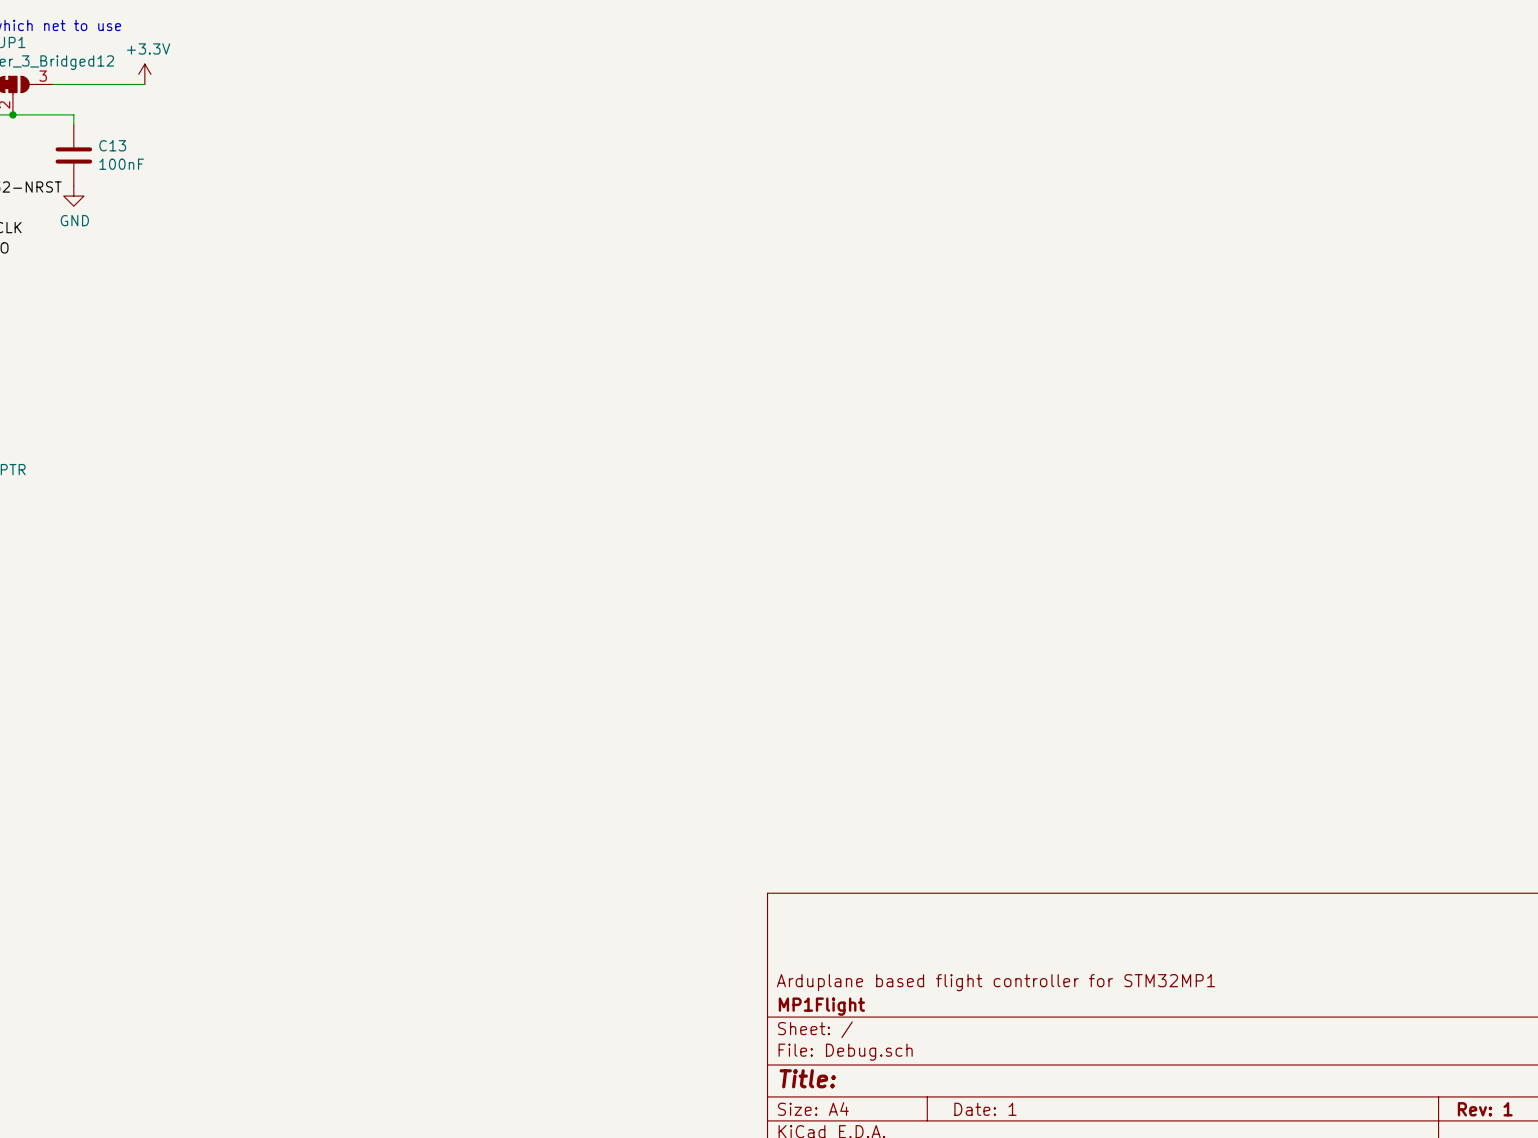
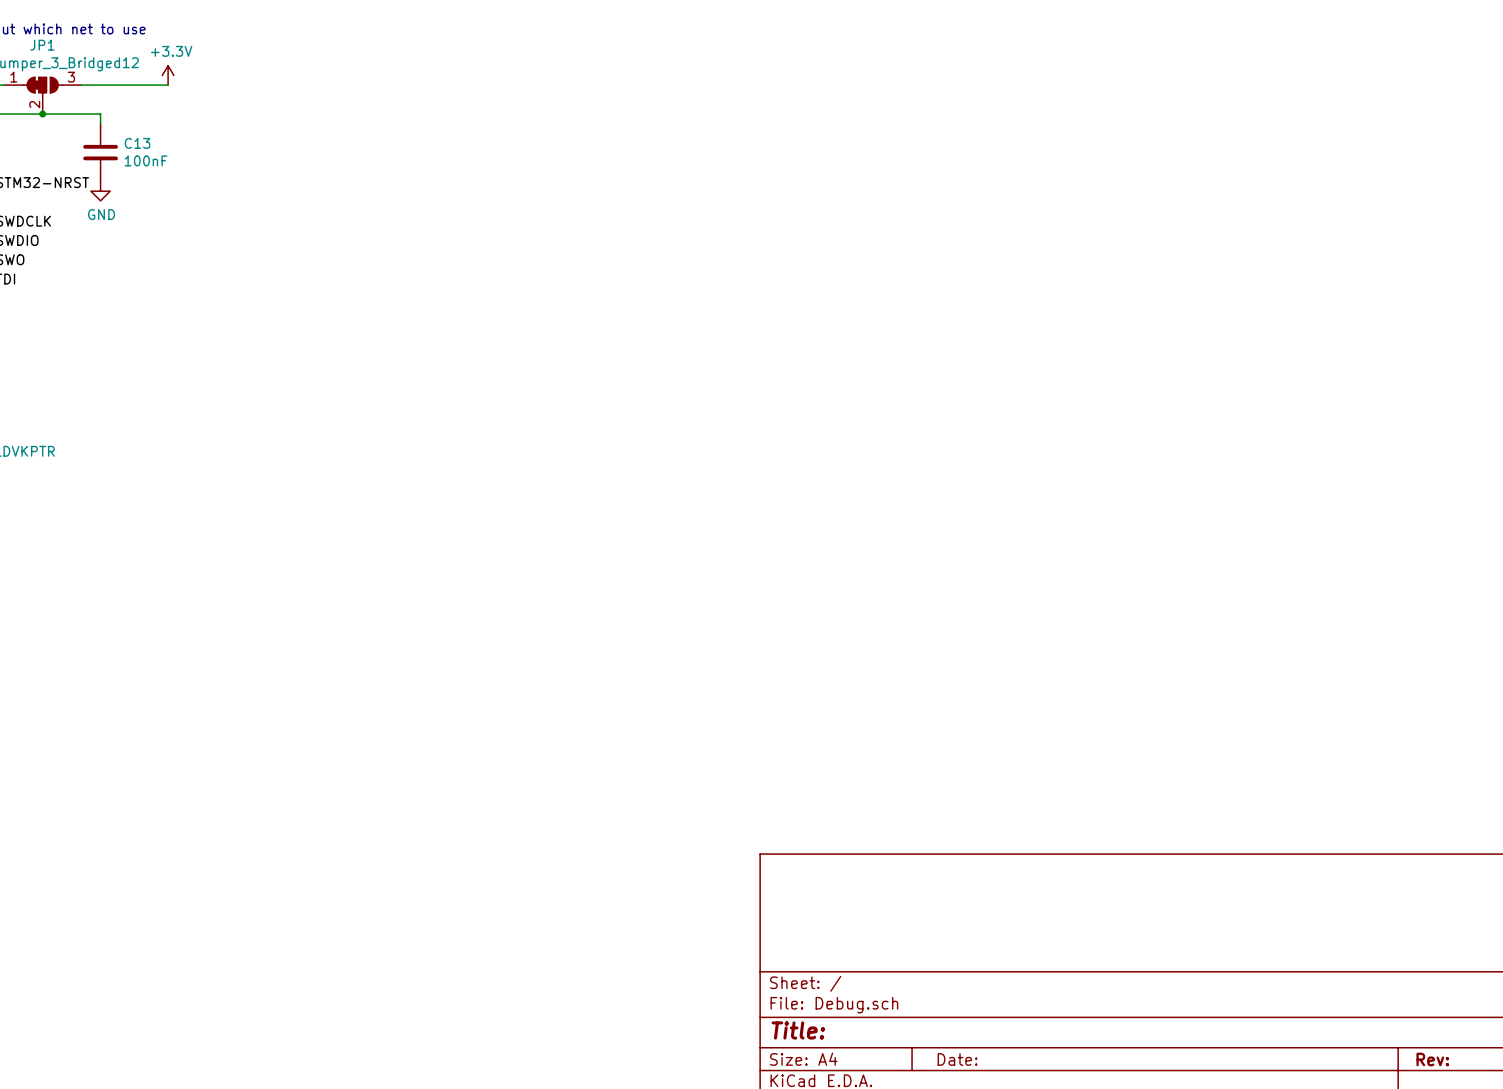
title block: Arduplane based flight controller for STM32MP1 (996, 982) -> none
title block: MP1Flight (821, 1006) -> none
title block: Date: 1 (985, 1109) -> Date: (957, 1059)
title block: Rev: 1 (1485, 1109) -> Rev: (1432, 1059)

